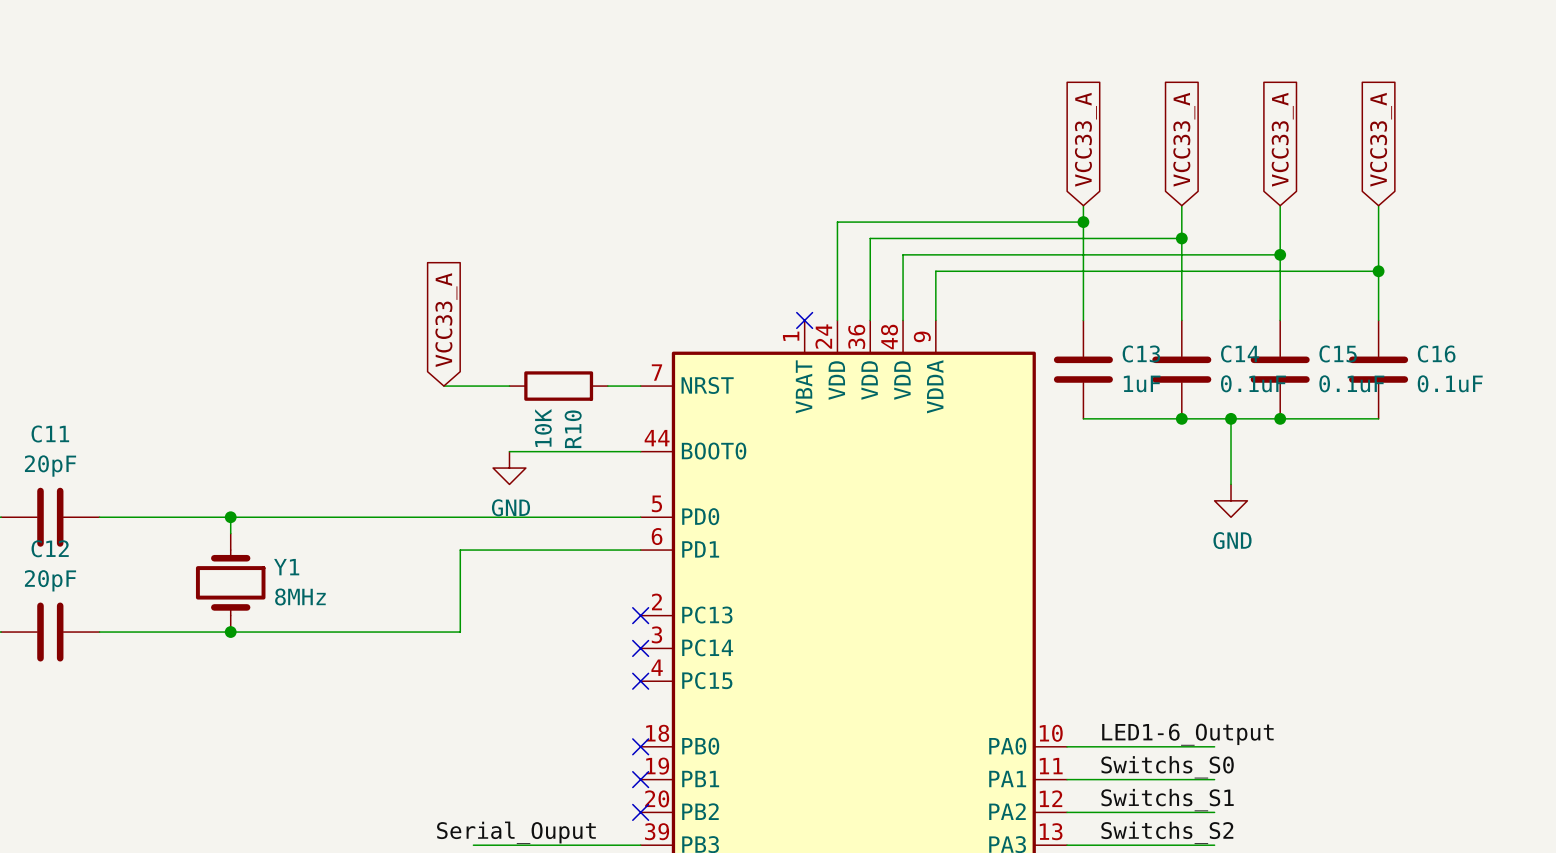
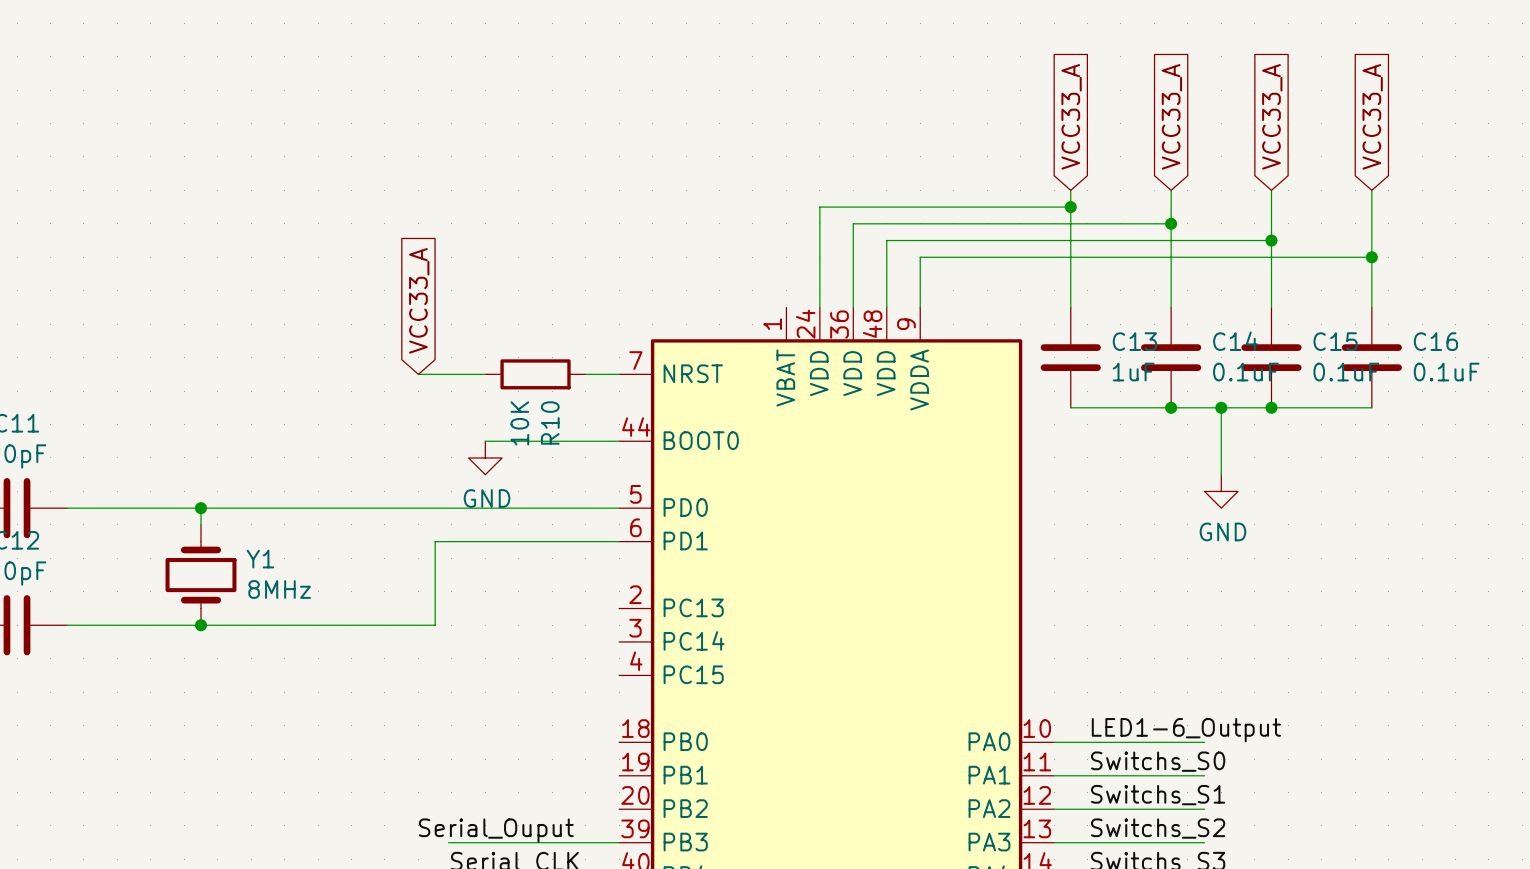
no-connect mark: (804, 320) -> none
no-connect mark: (640, 615) -> none
no-connect mark: (640, 648) -> none
no-connect mark: (640, 681) -> none
no-connect mark: (640, 746) -> none
no-connect mark: (640, 779) -> none
no-connect mark: (640, 812) -> none

